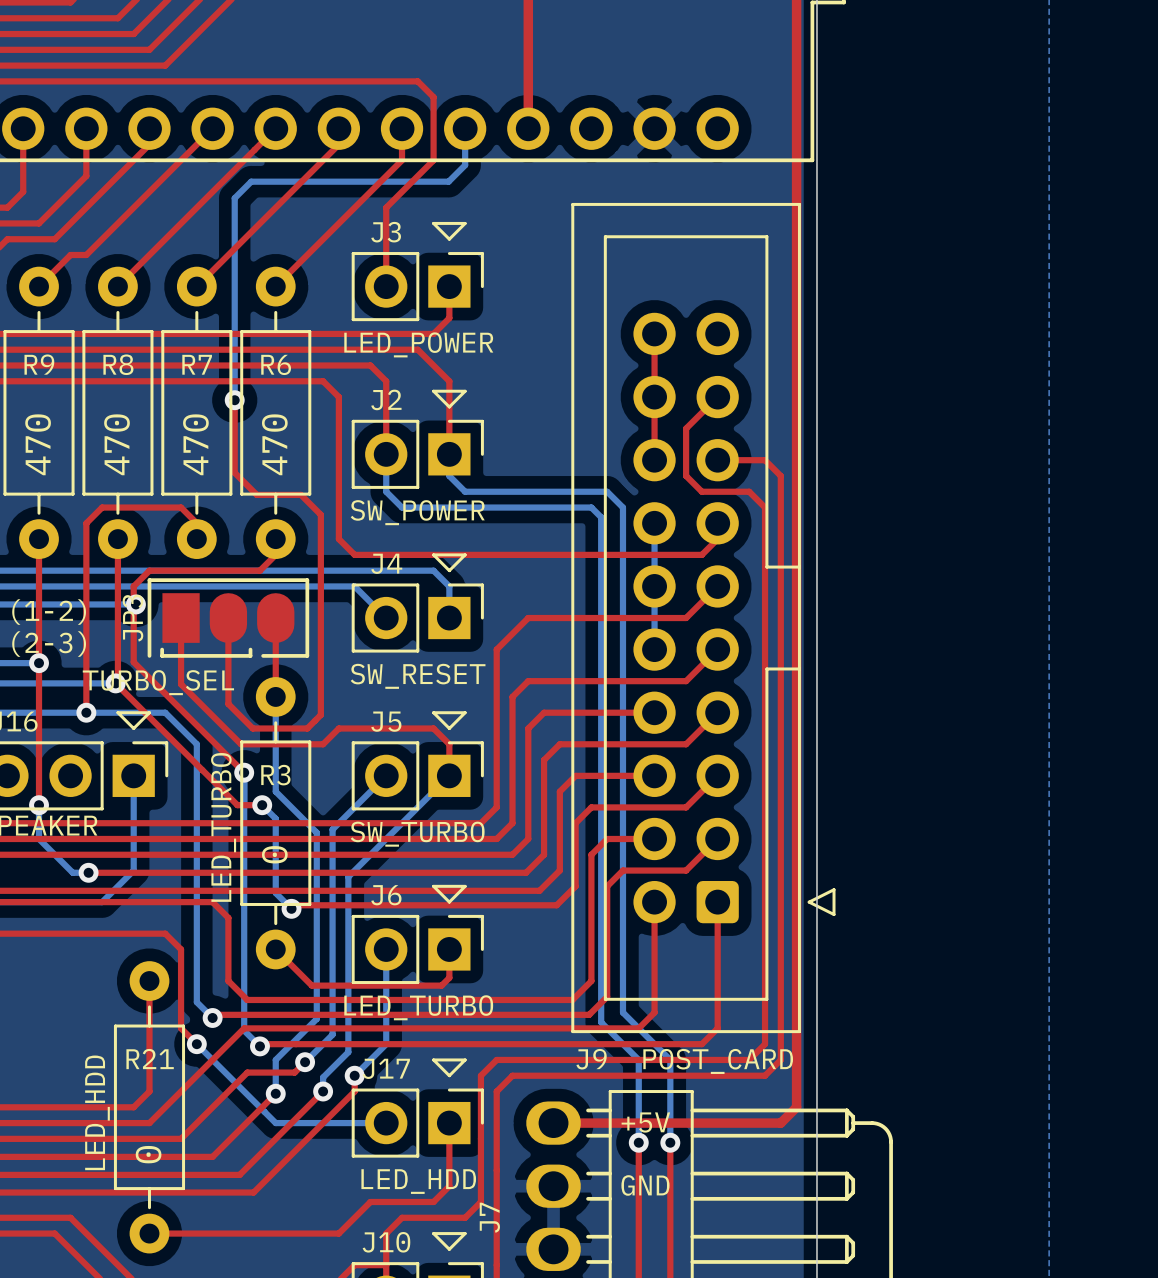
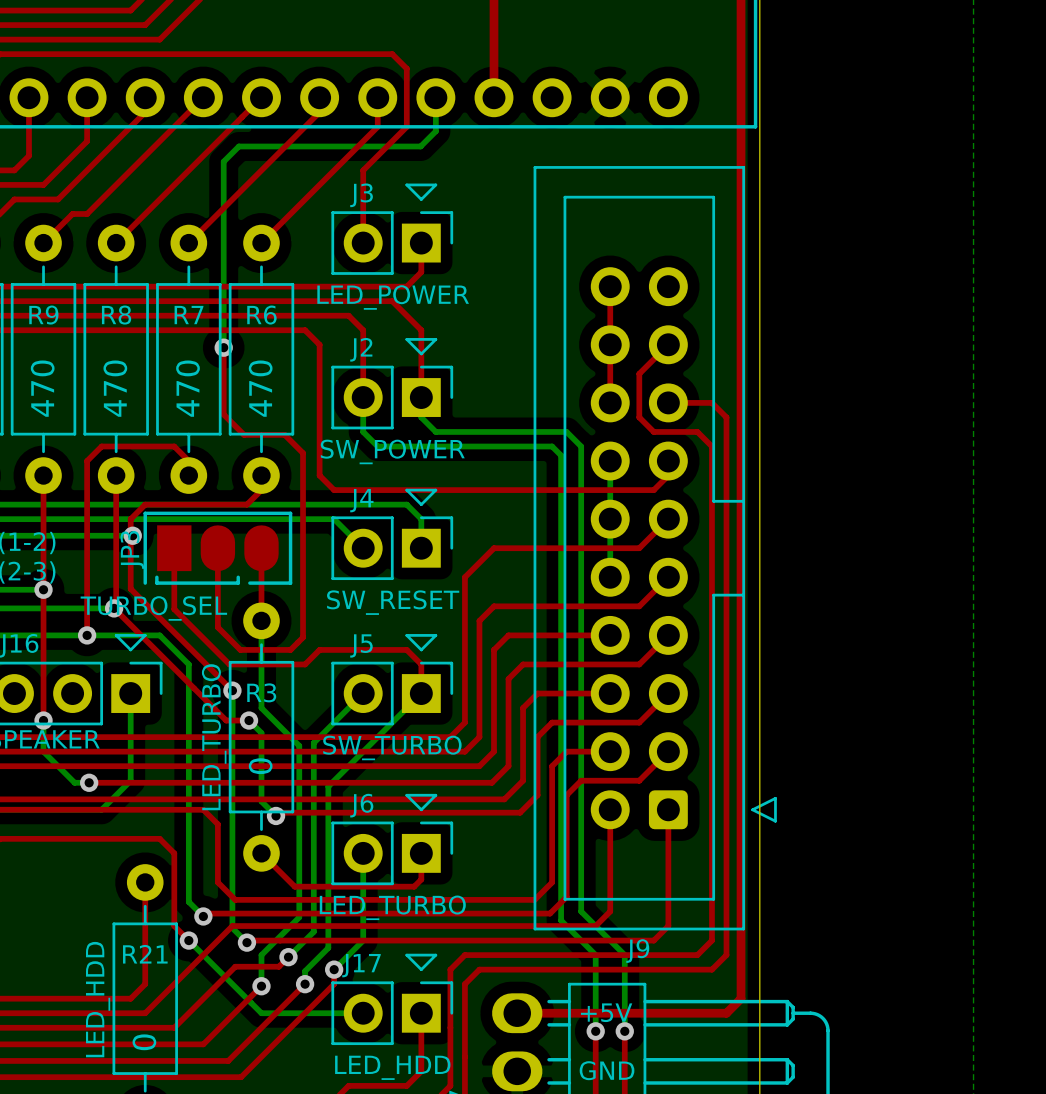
J9 name position: J9 (591, 1059) -> J9 (637, 951)
J9 value: POST_CARD (718, 1061) -> none

